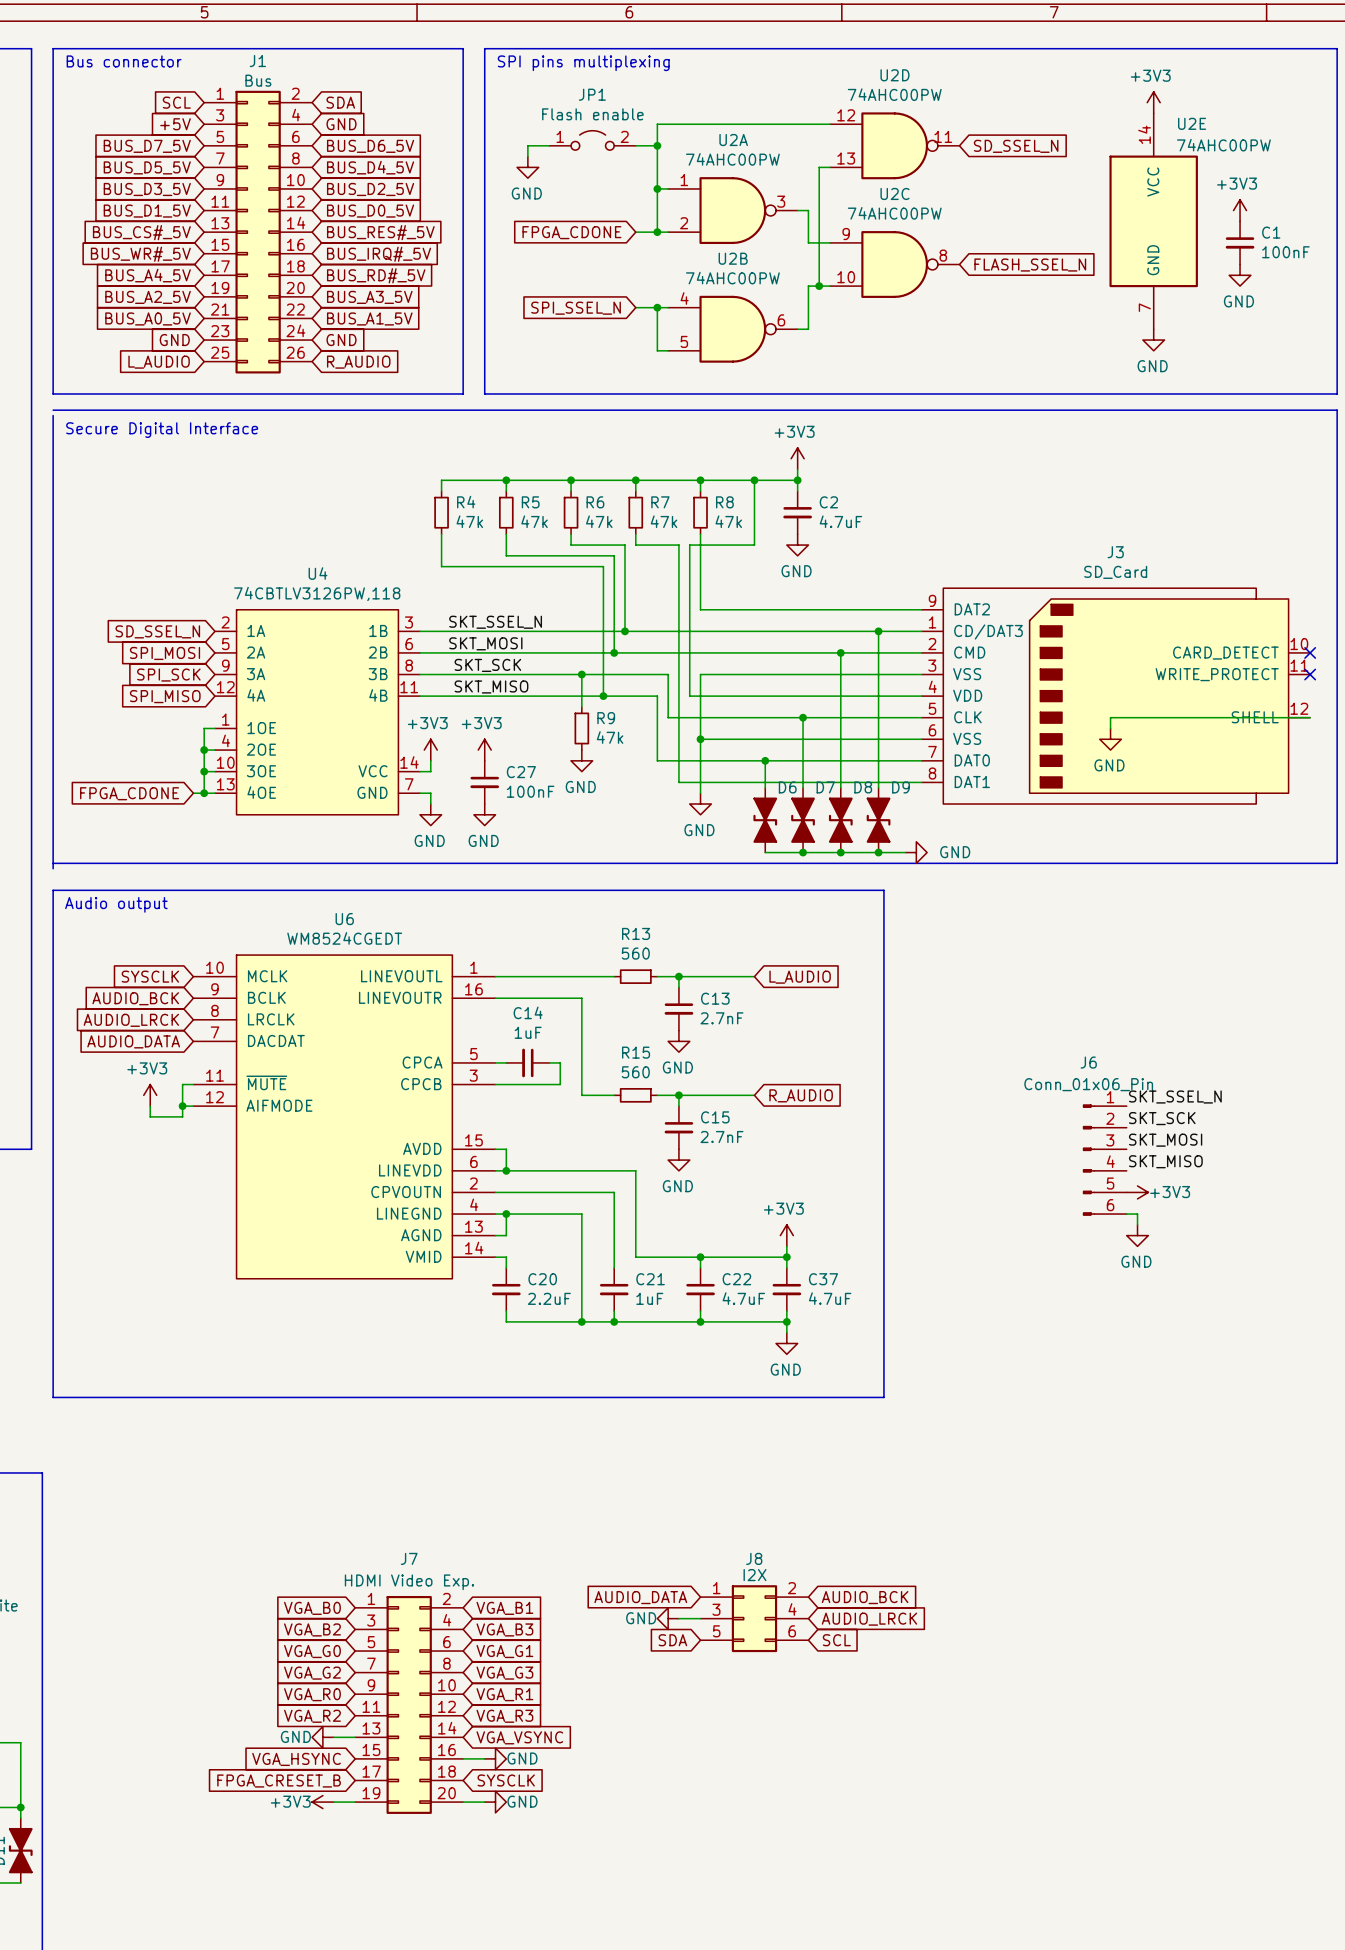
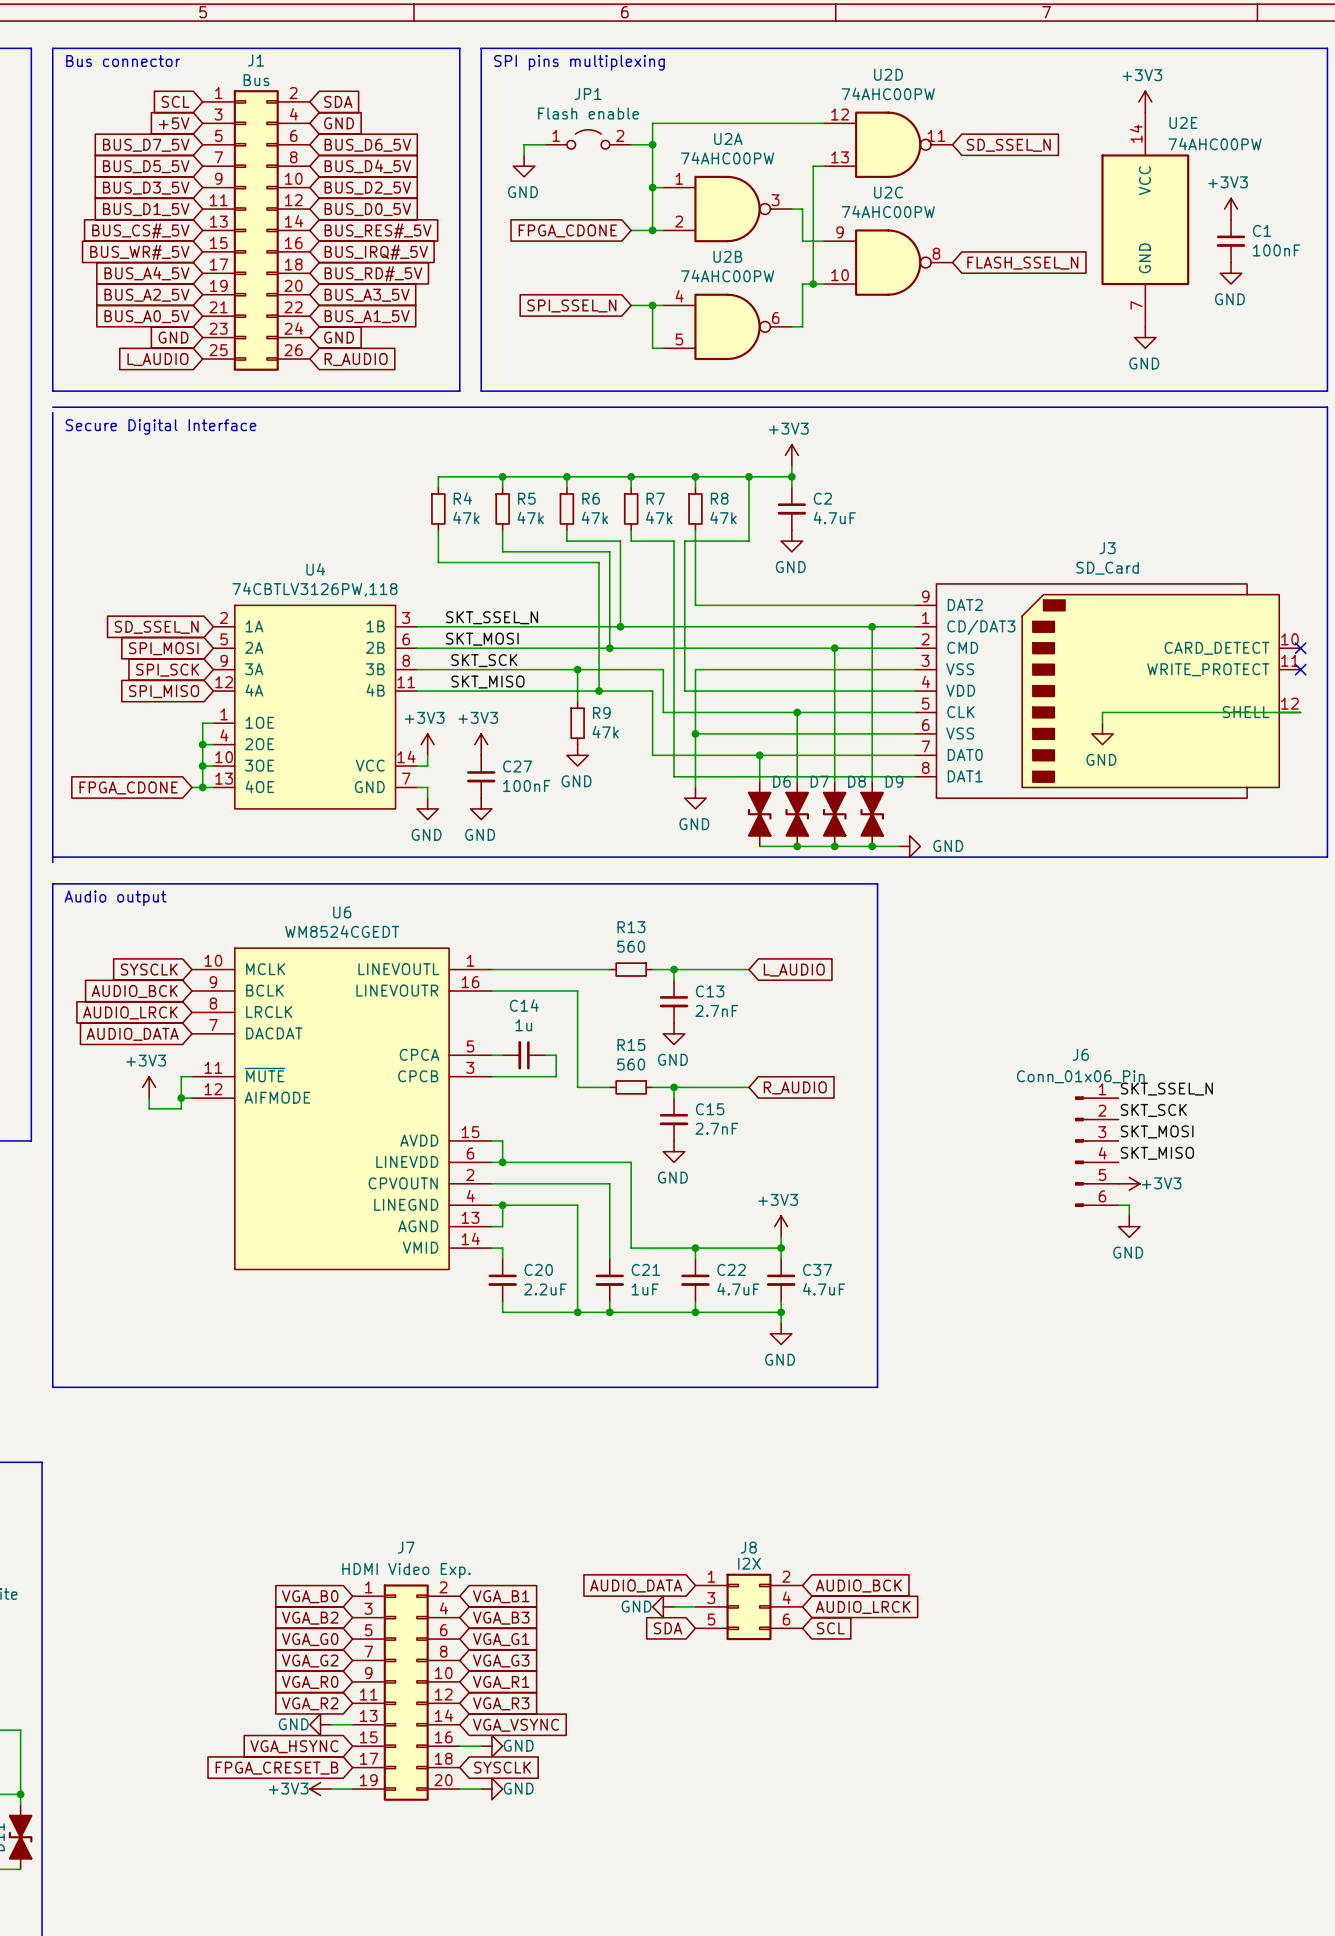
C14 value: 1uF (528, 1032) -> 1u (523, 1025)

